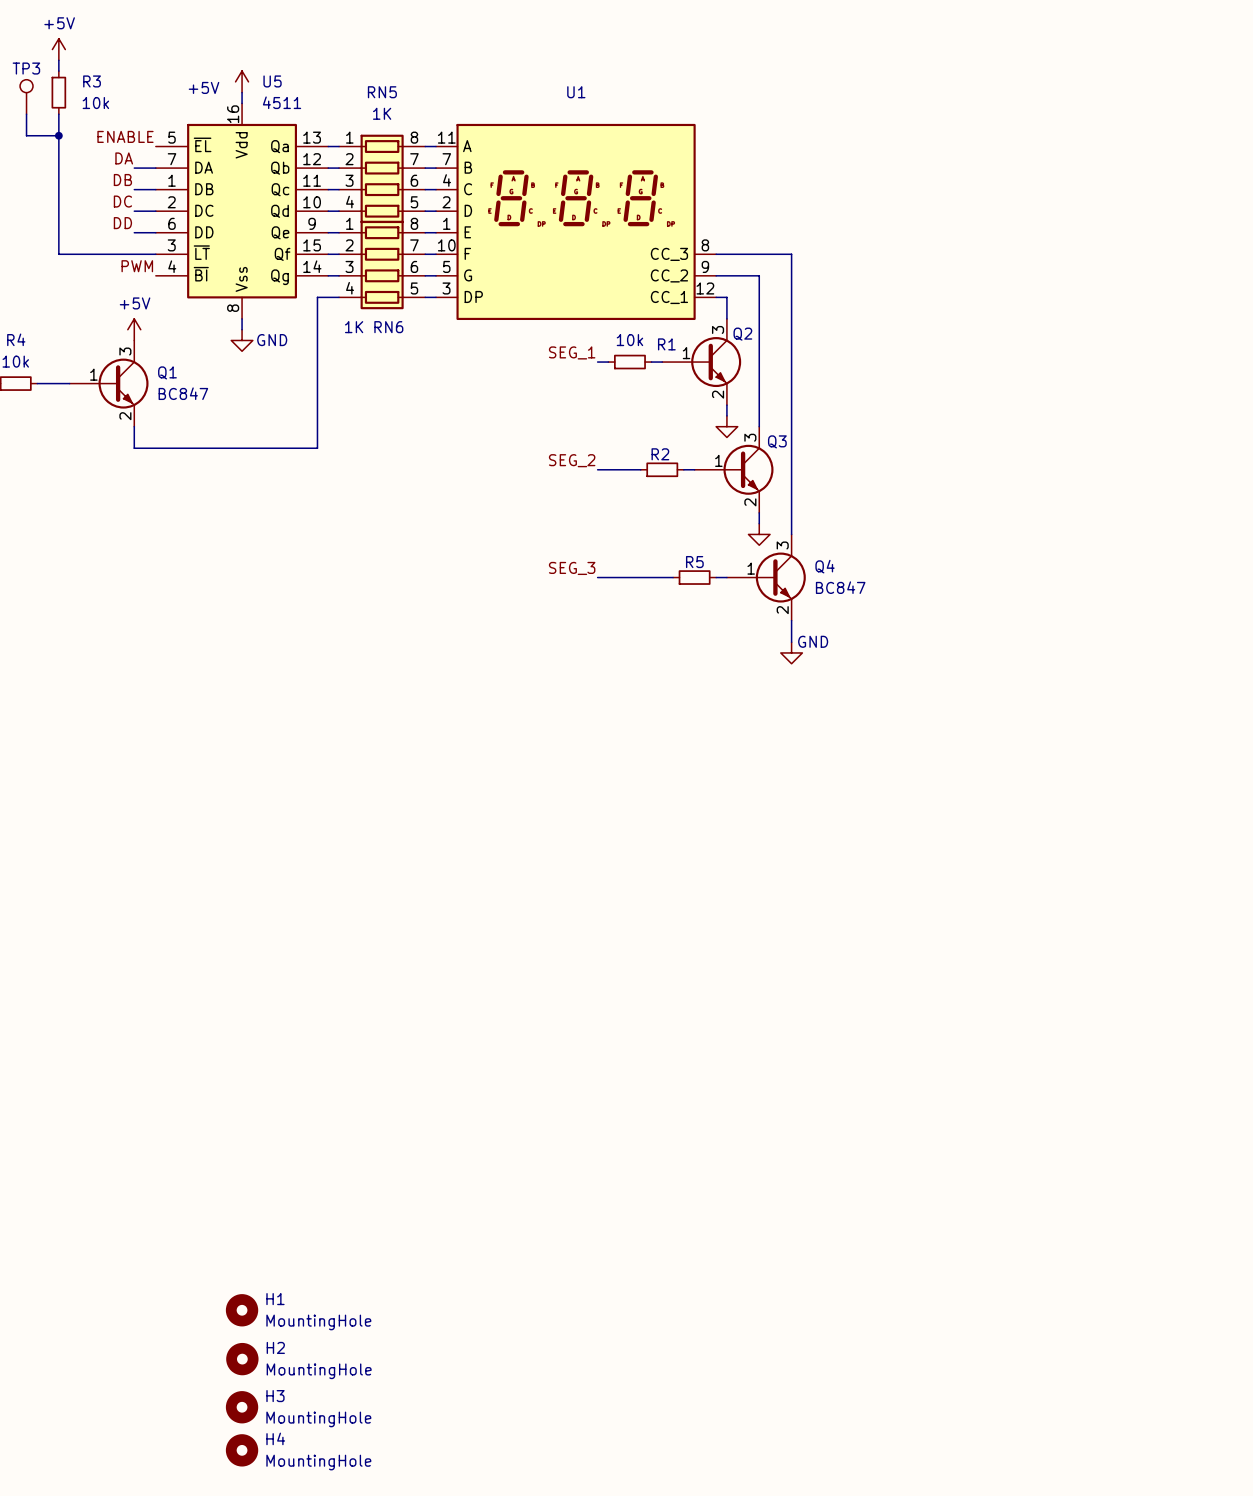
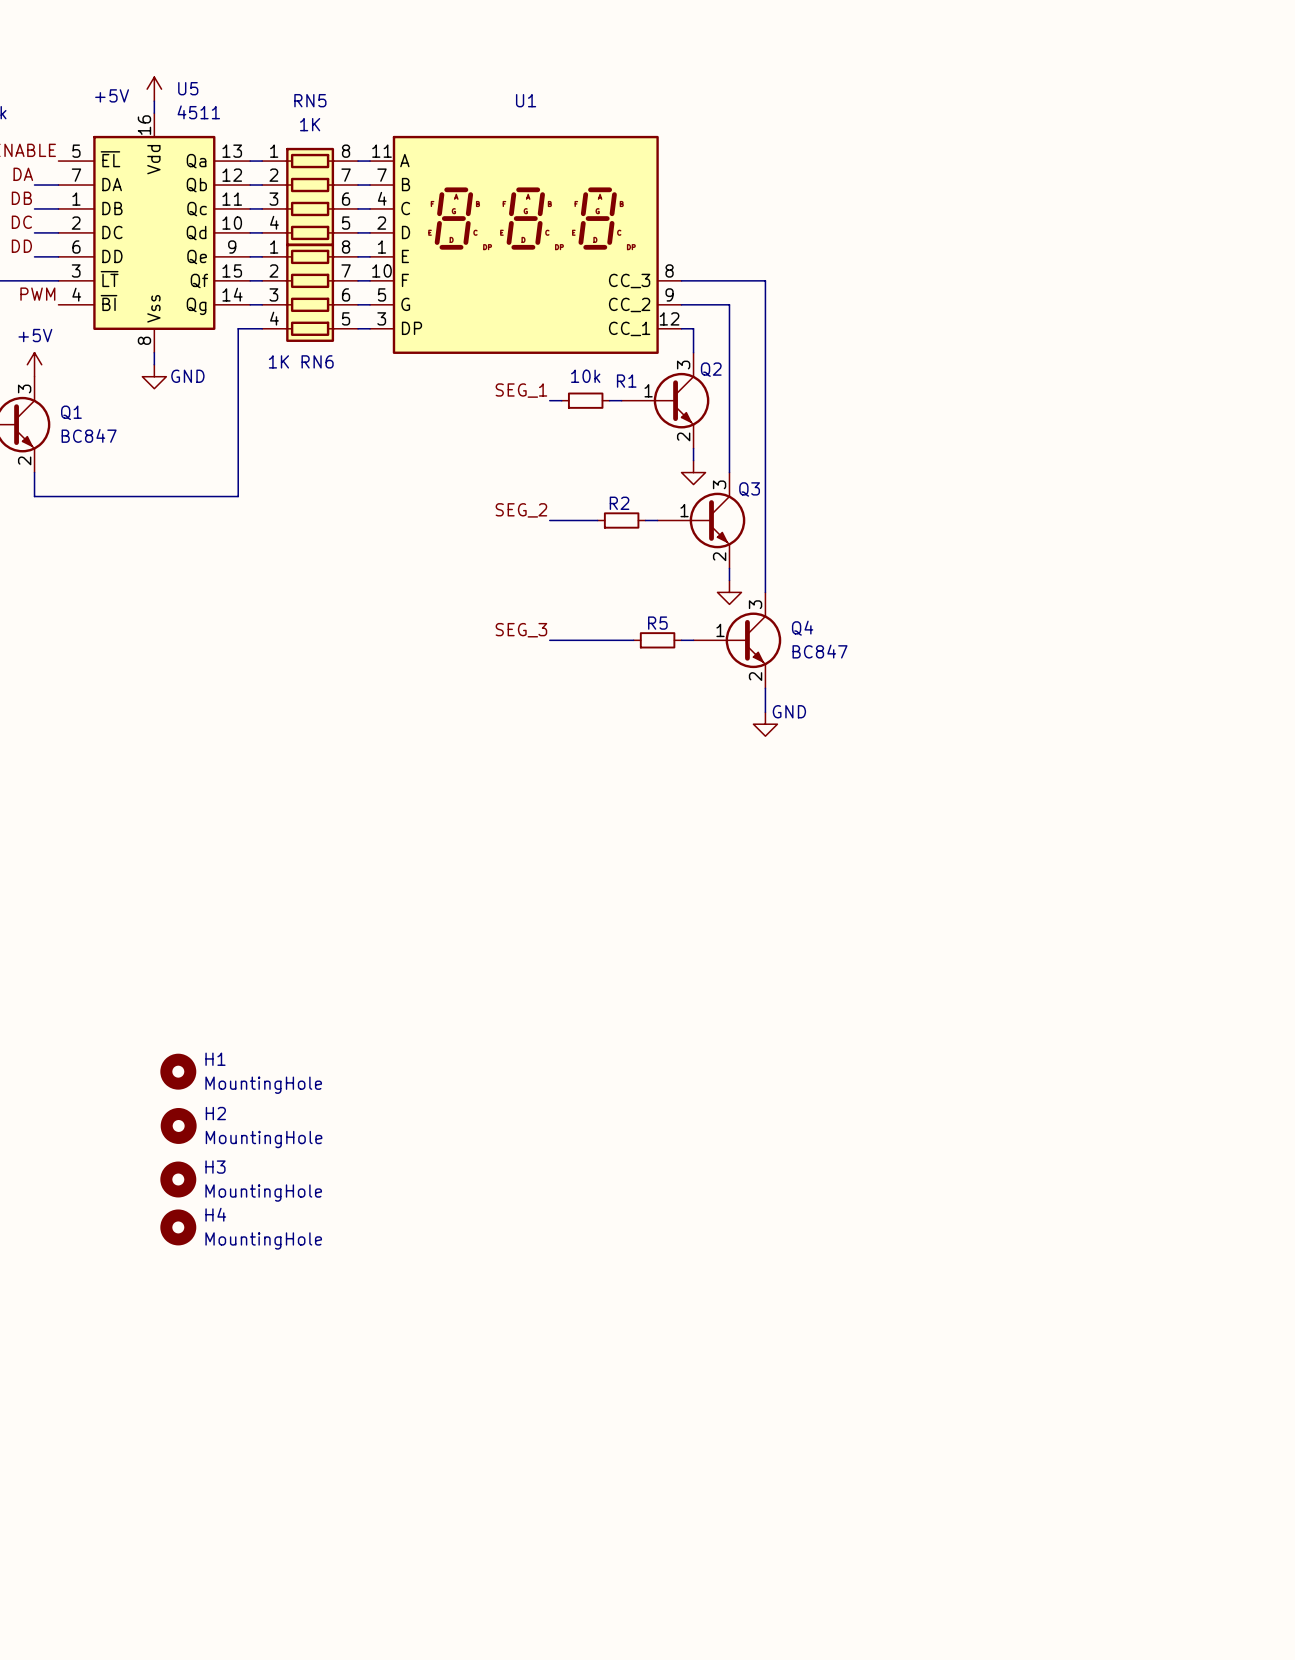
H1 position: (242, 1310) -> (178, 1071)
H2 position: (242, 1359) -> (178, 1125)
H3 position: (242, 1407) -> (178, 1179)
H4 position: (242, 1450) -> (178, 1227)

